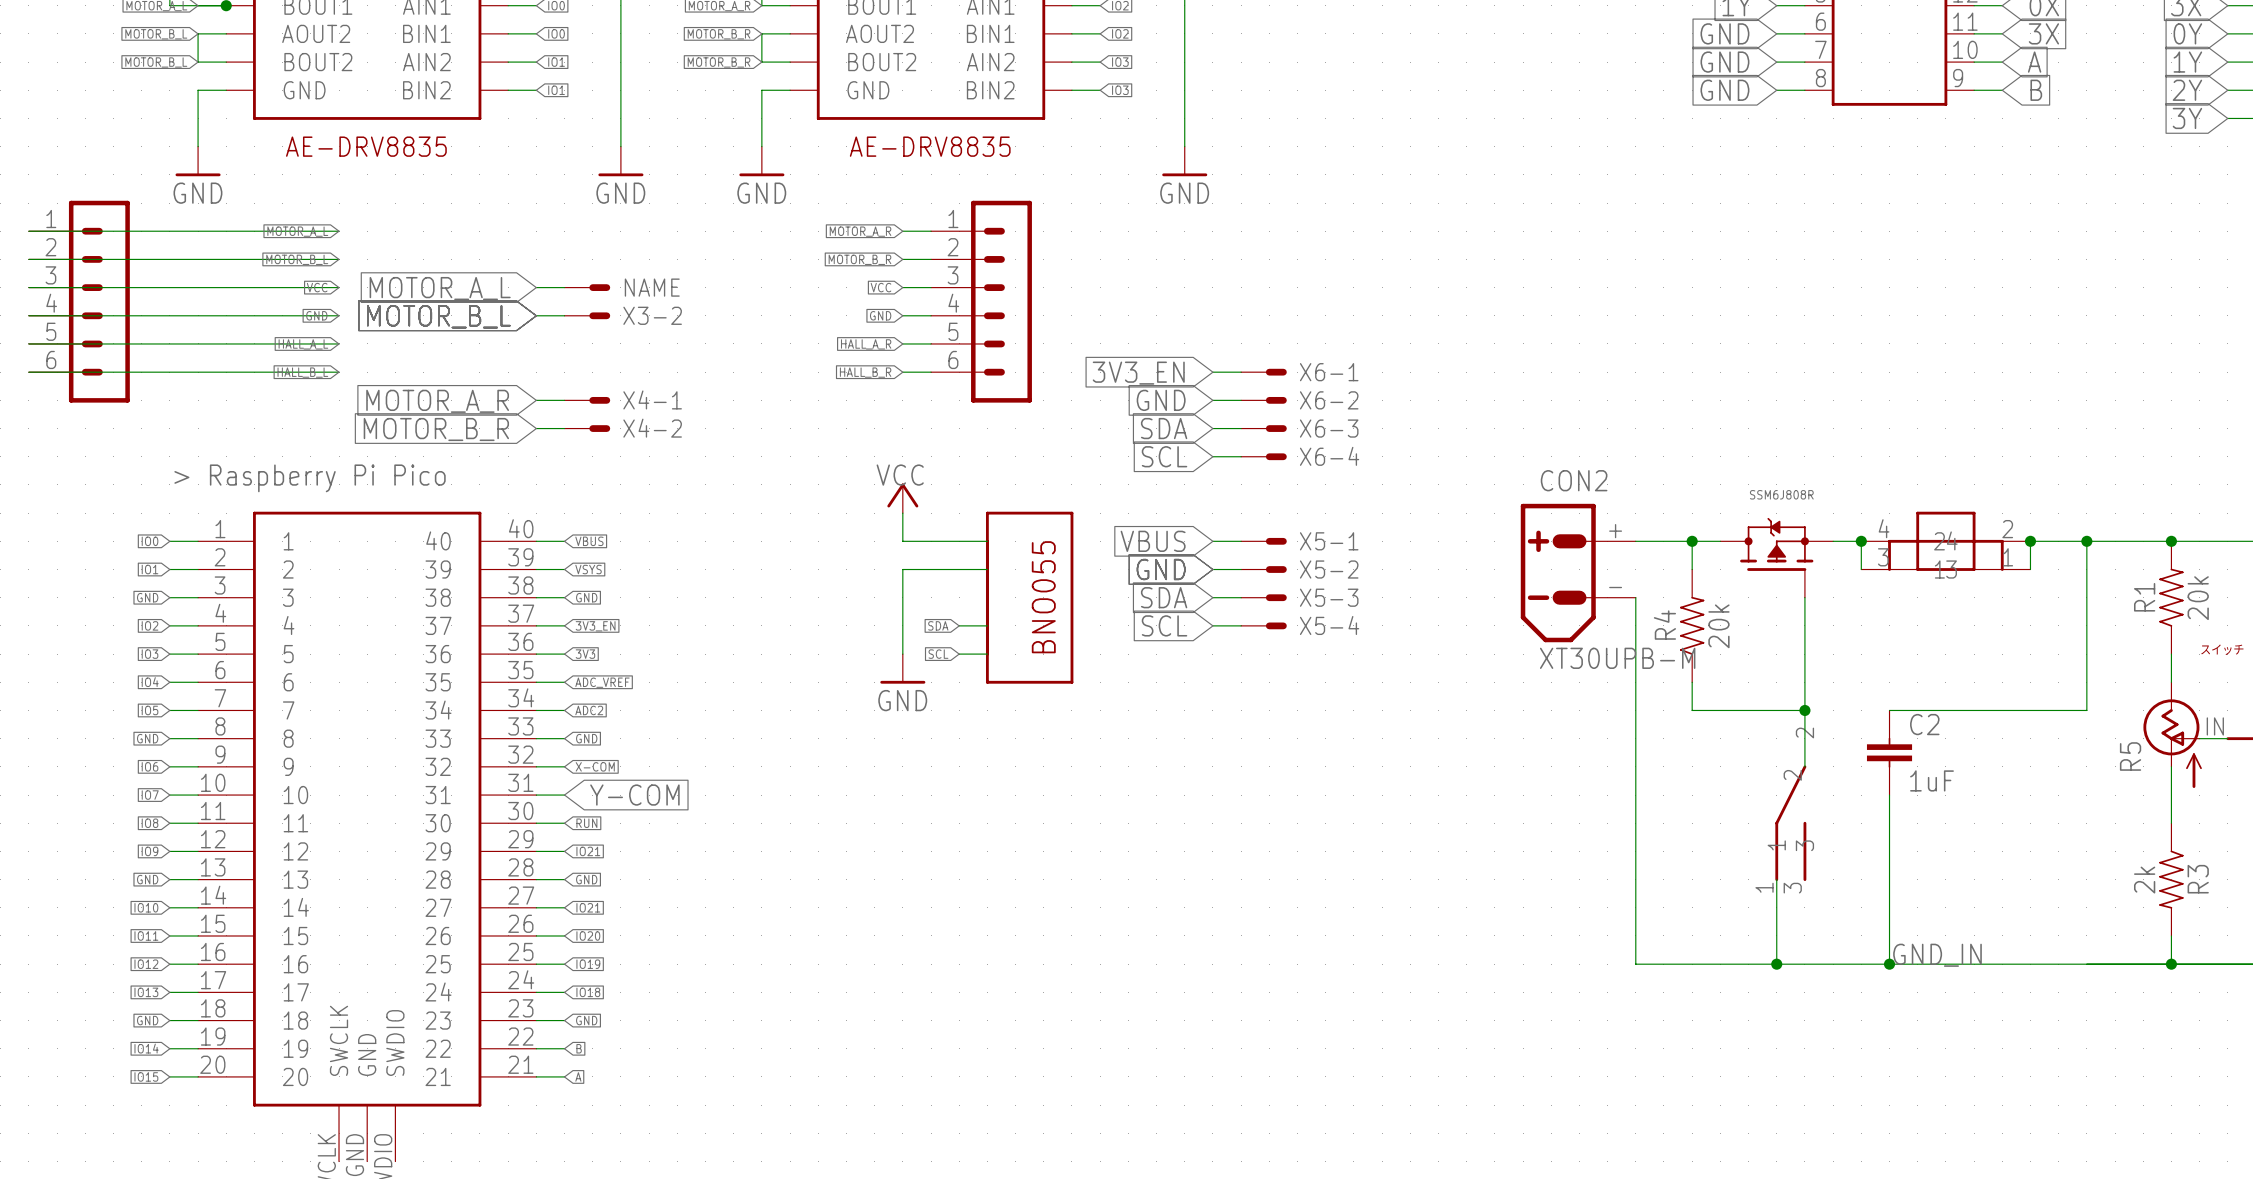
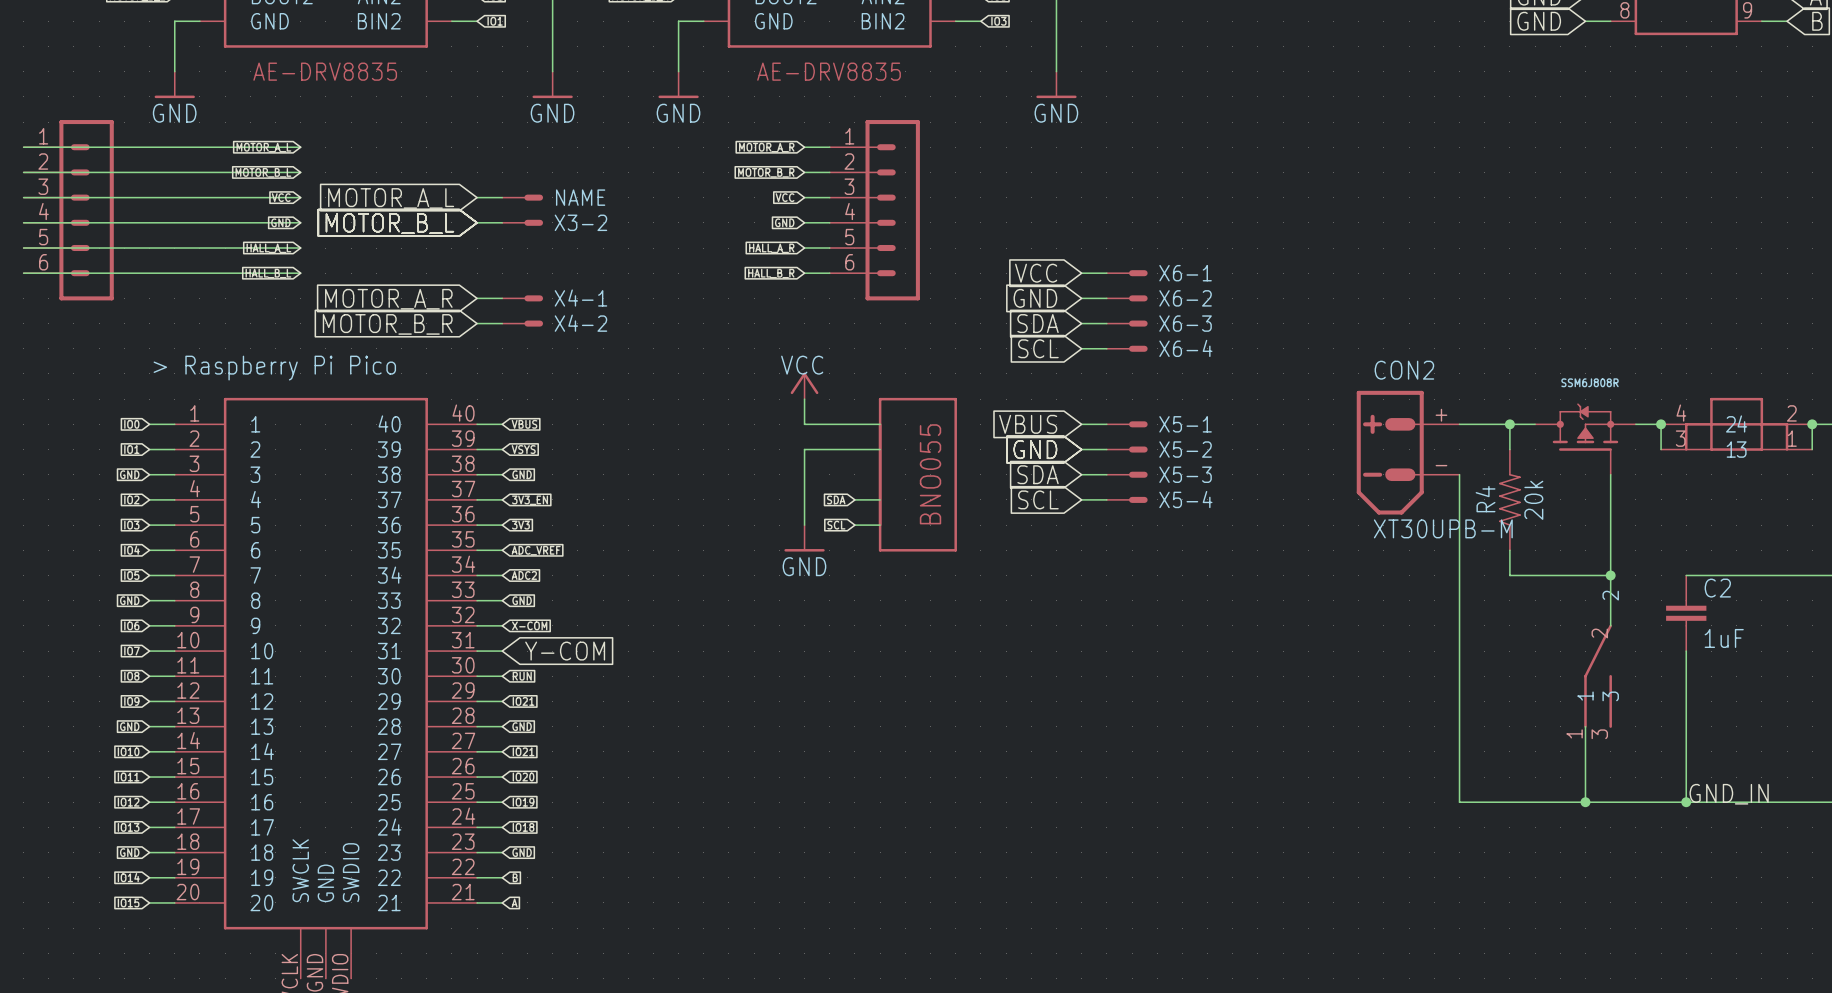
global label: 3V3_EN (1138, 373) -> VCC (1036, 273)

